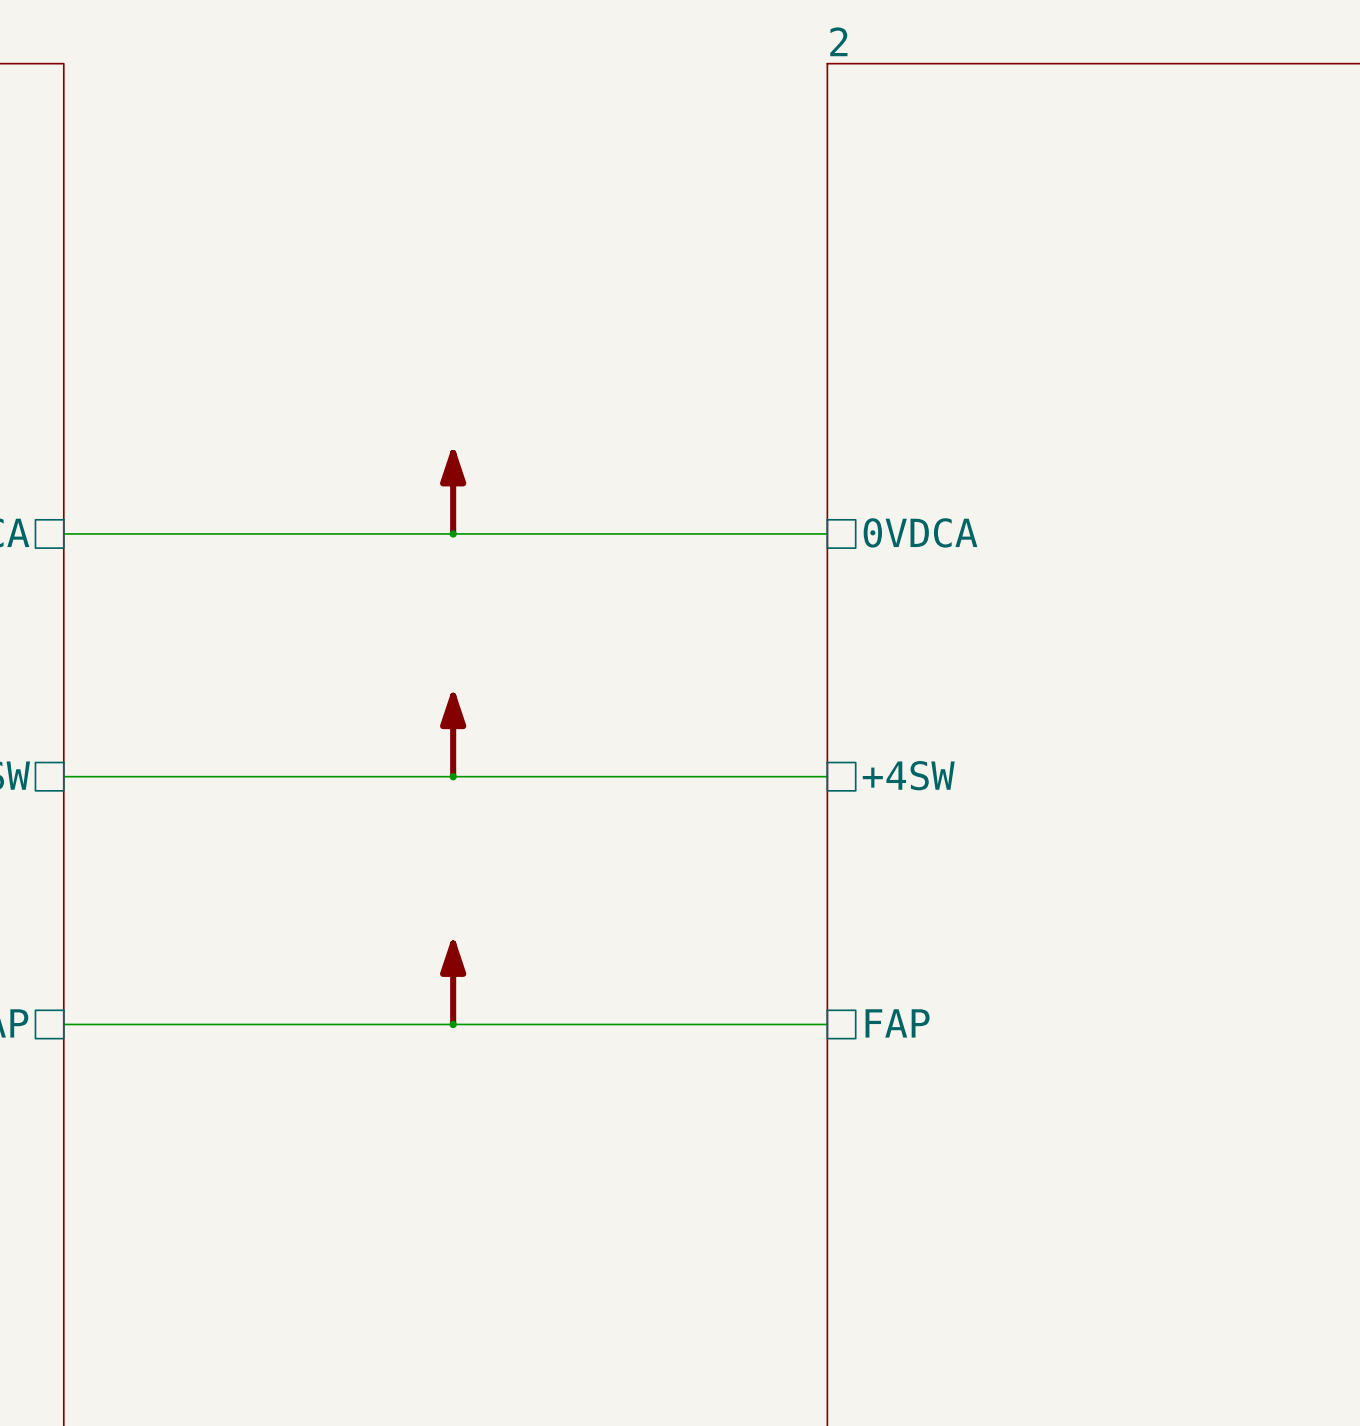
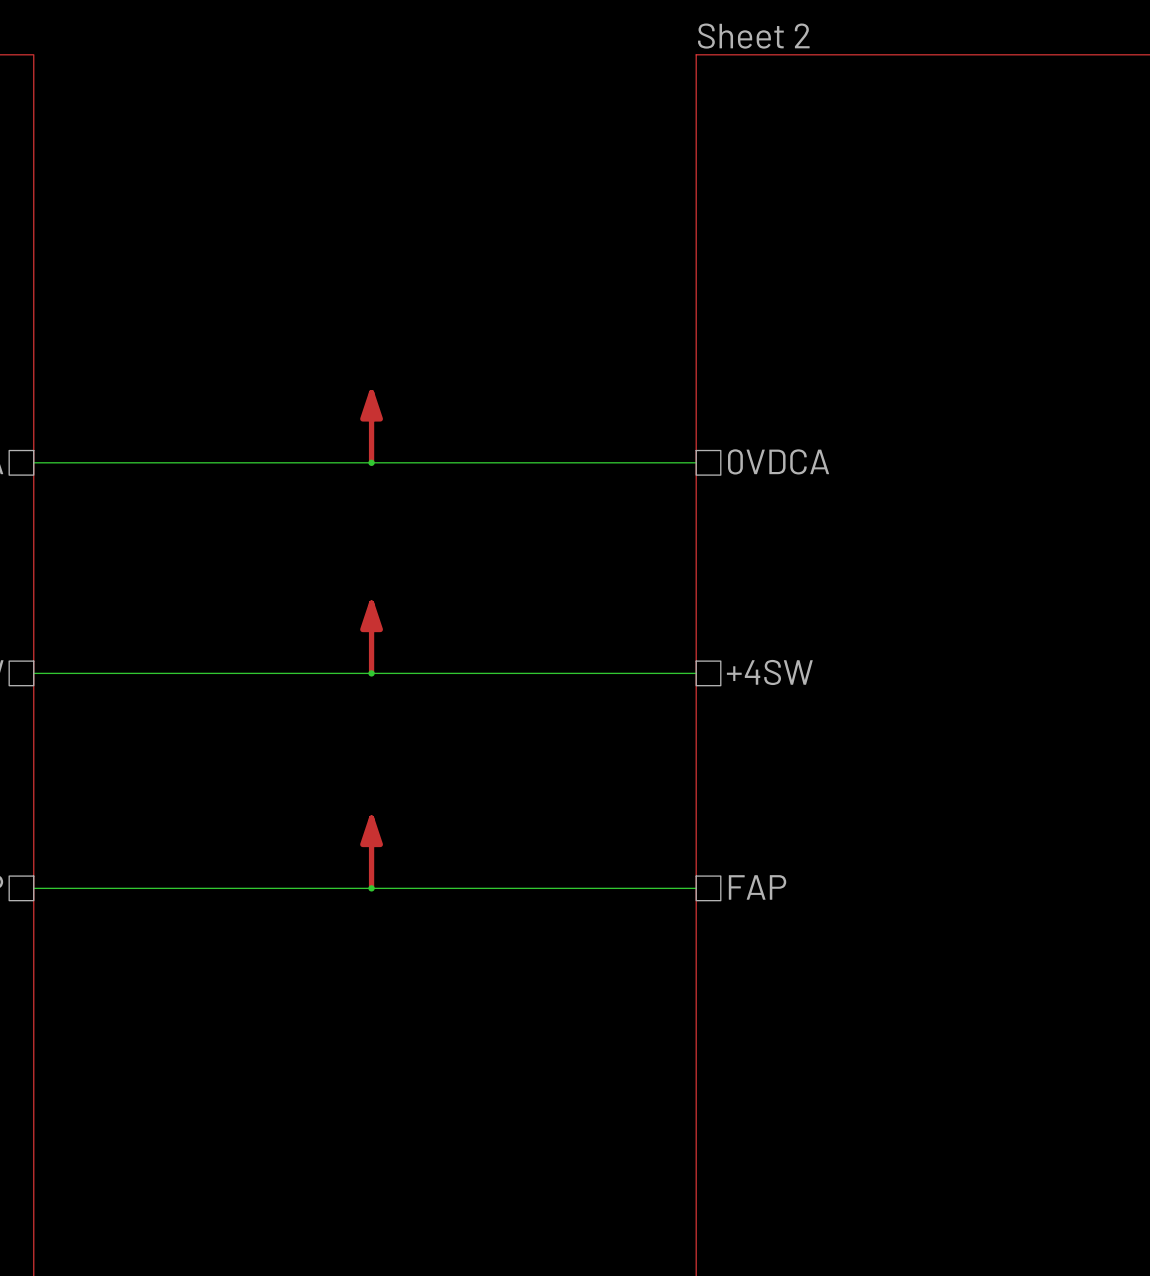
sheet 2 name: 2 (838, 41) -> Sheet 2 (753, 36)

